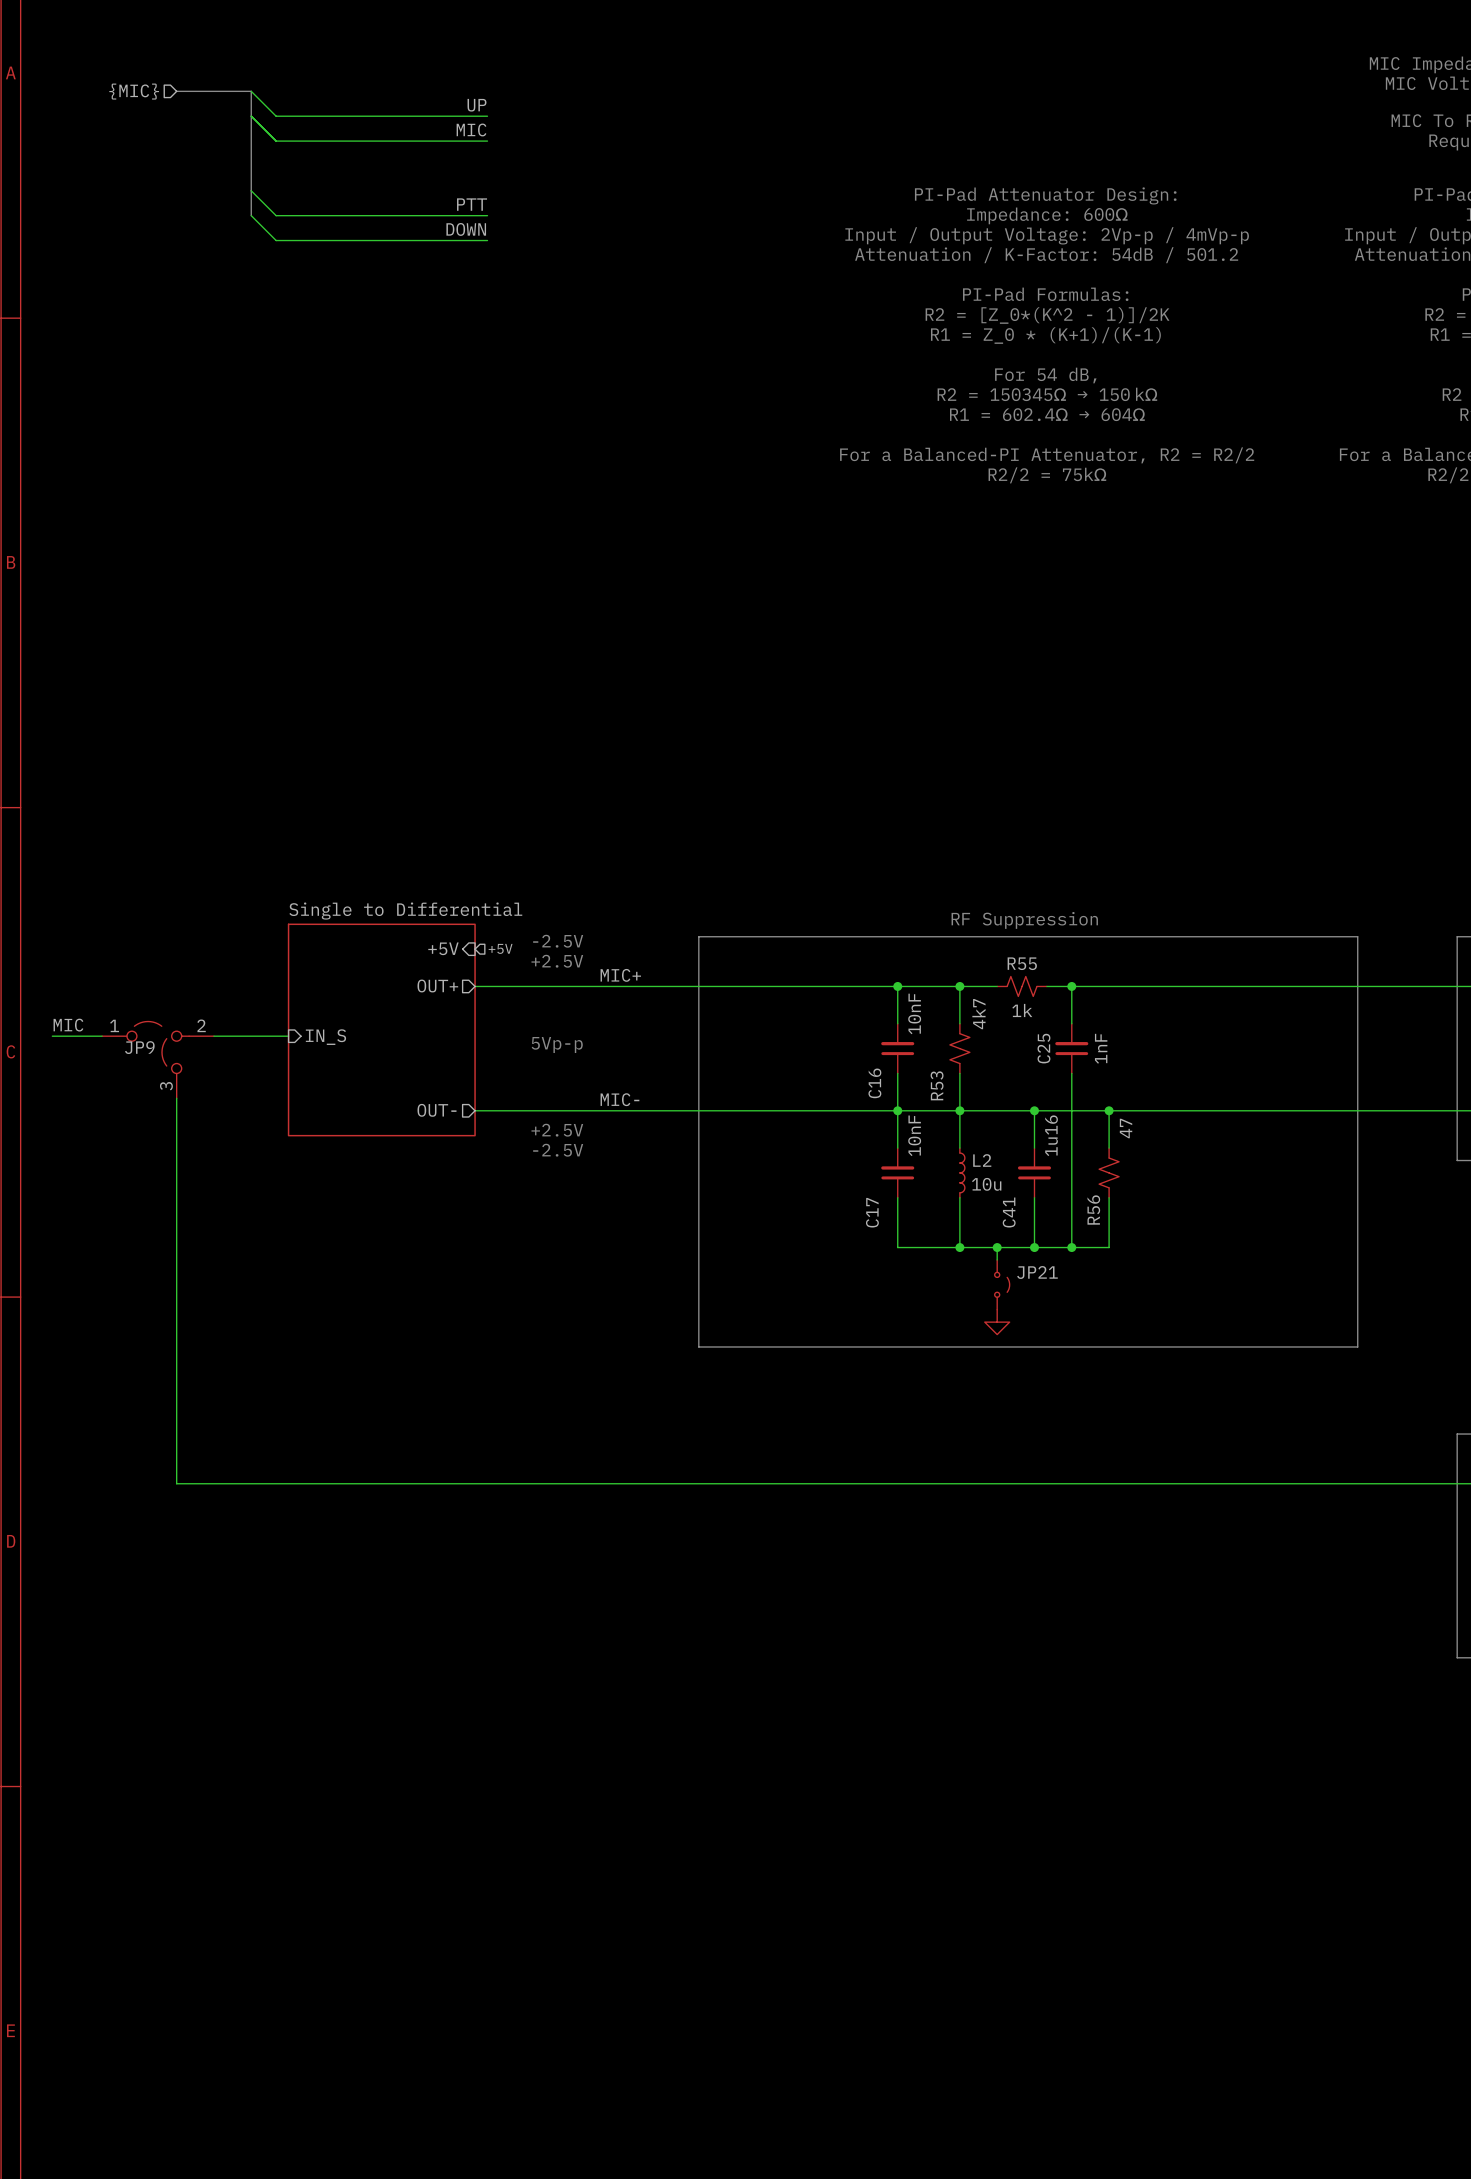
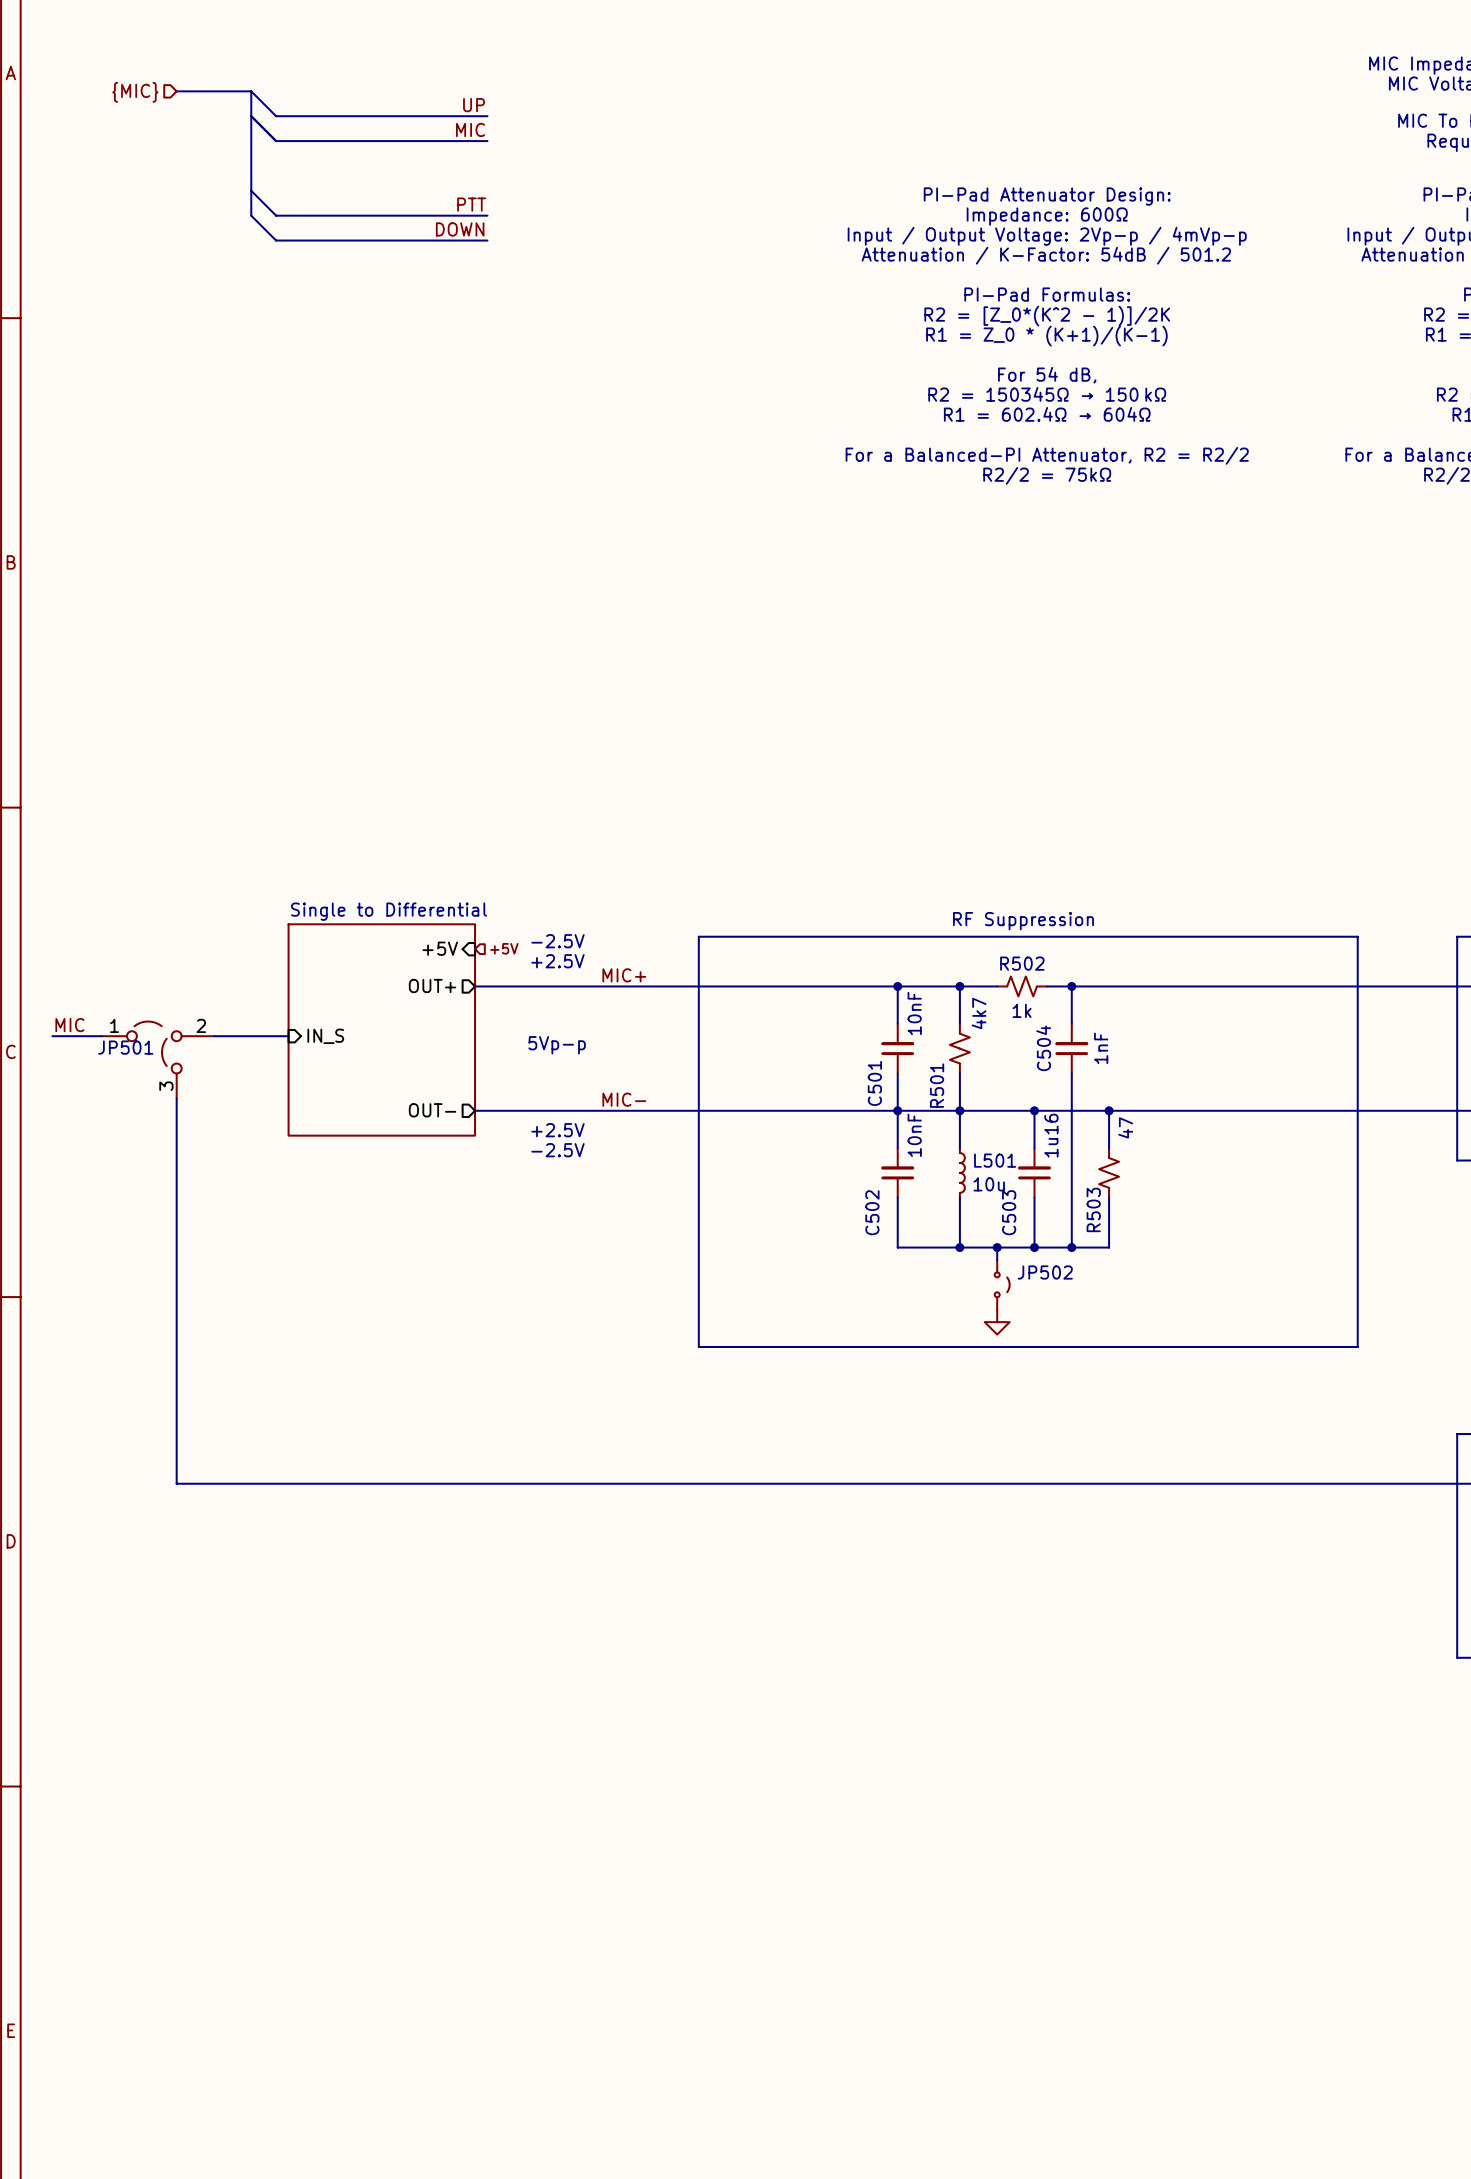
R55 name: R55 (1022, 963) -> R502 (1022, 963)
JP9 name: JP9 (139, 1047) -> JP501 (125, 1047)
C25 name: C25 (1043, 1048) -> C504 (1043, 1048)
C16 name: C16 (874, 1083) -> C501 (874, 1083)
R53 name: R53 (937, 1085) -> R501 (937, 1085)
L2 name: L2 (982, 1160) -> L501 (995, 1160)
R56 name: R56 (1093, 1210) -> R503 (1093, 1209)
C17 name: C17 (872, 1212) -> C502 (872, 1212)
C41 name: C41 (1009, 1212) -> C503 (1009, 1212)
JP21 name: JP21 (1037, 1272) -> JP502 (1045, 1272)

